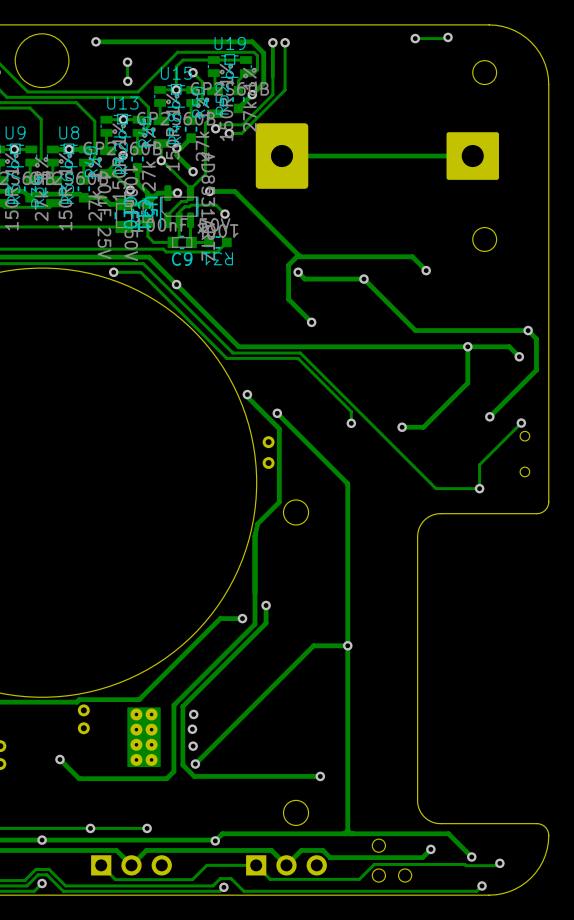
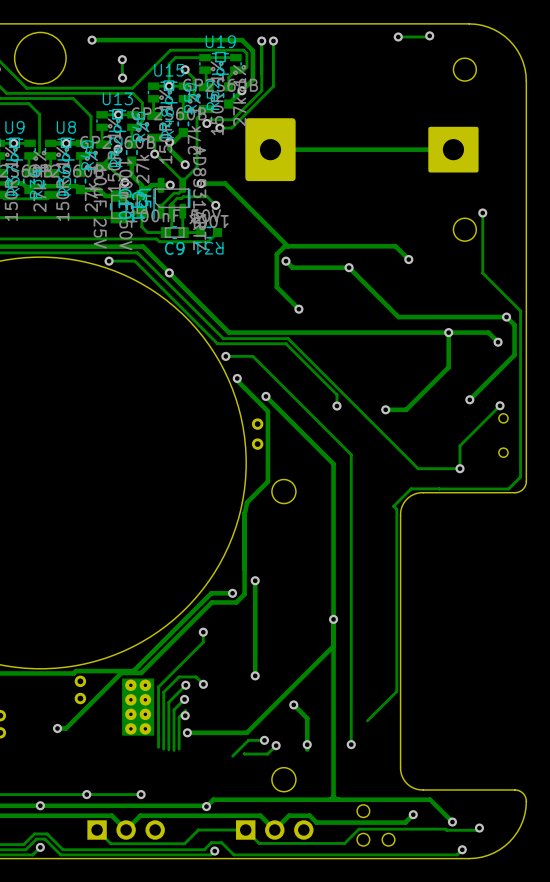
track: none -> (482, 213) (482, 273) (520, 310) (520, 477) (508, 488) (411, 488) (393, 506) (396, 509) (396, 691) (367, 720)
via: none -> (482, 213)
track: none -> (225, 356) (252, 356) (351, 454) (351, 744)
via: none -> (225, 356)
track: (255, 619) (255, 624) (173, 705) (173, 771) (166, 778) (79, 778) (59, 759) -> (244, 594) (236, 602) (211, 602) (141, 673) (121, 673) (66, 728) (57, 728)
track: (266, 623) (182, 706) (182, 765) (194, 776) (320, 776) -> (255, 597) (255, 675)
track: (347, 645) (313, 645) (195, 764) -> (333, 646) (246, 732) (187, 732)
track: none -> (203, 632) (203, 642) (158, 687) (158, 747)
via: none -> (203, 632)
via: none -> (255, 675)
track: none -> (203, 684) (196, 676) (179, 676) (163, 692) (163, 749)
via: none -> (203, 684)
track: none -> (185, 685) (168, 702) (168, 749)
track: none -> (184, 699) (173, 710) (173, 750)
track: none -> (293, 704) (307, 718) (307, 749)
via: none -> (293, 704)
track: none -> (185, 710) (179, 717) (179, 749)
track: none -> (264, 740) (248, 740) (232, 756)
via: none -> (264, 740)
via: none -> (351, 744)
track: none -> (276, 745) (267, 754) (244, 753)
via: none -> (276, 745)

